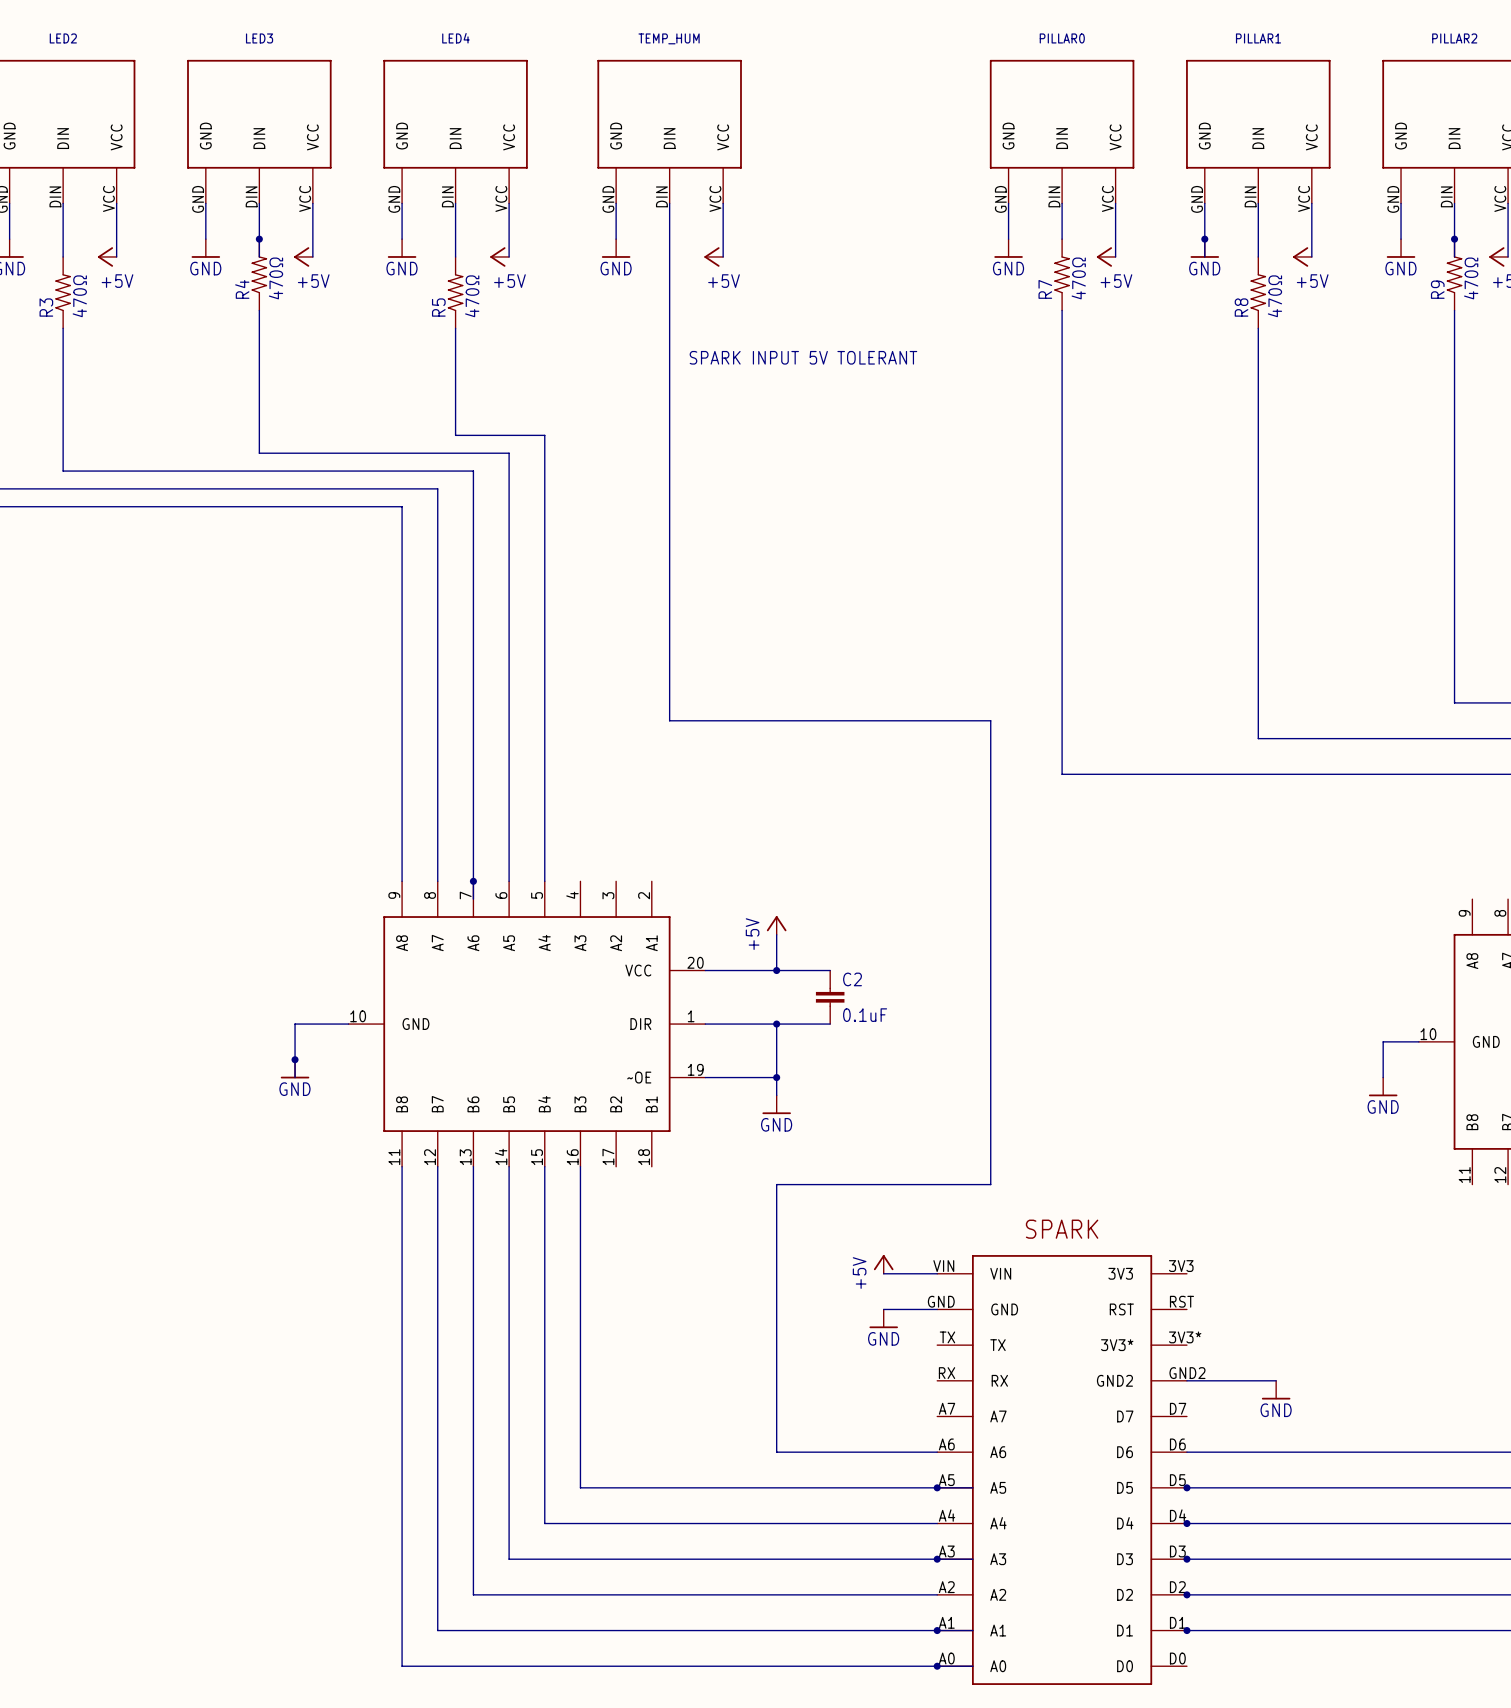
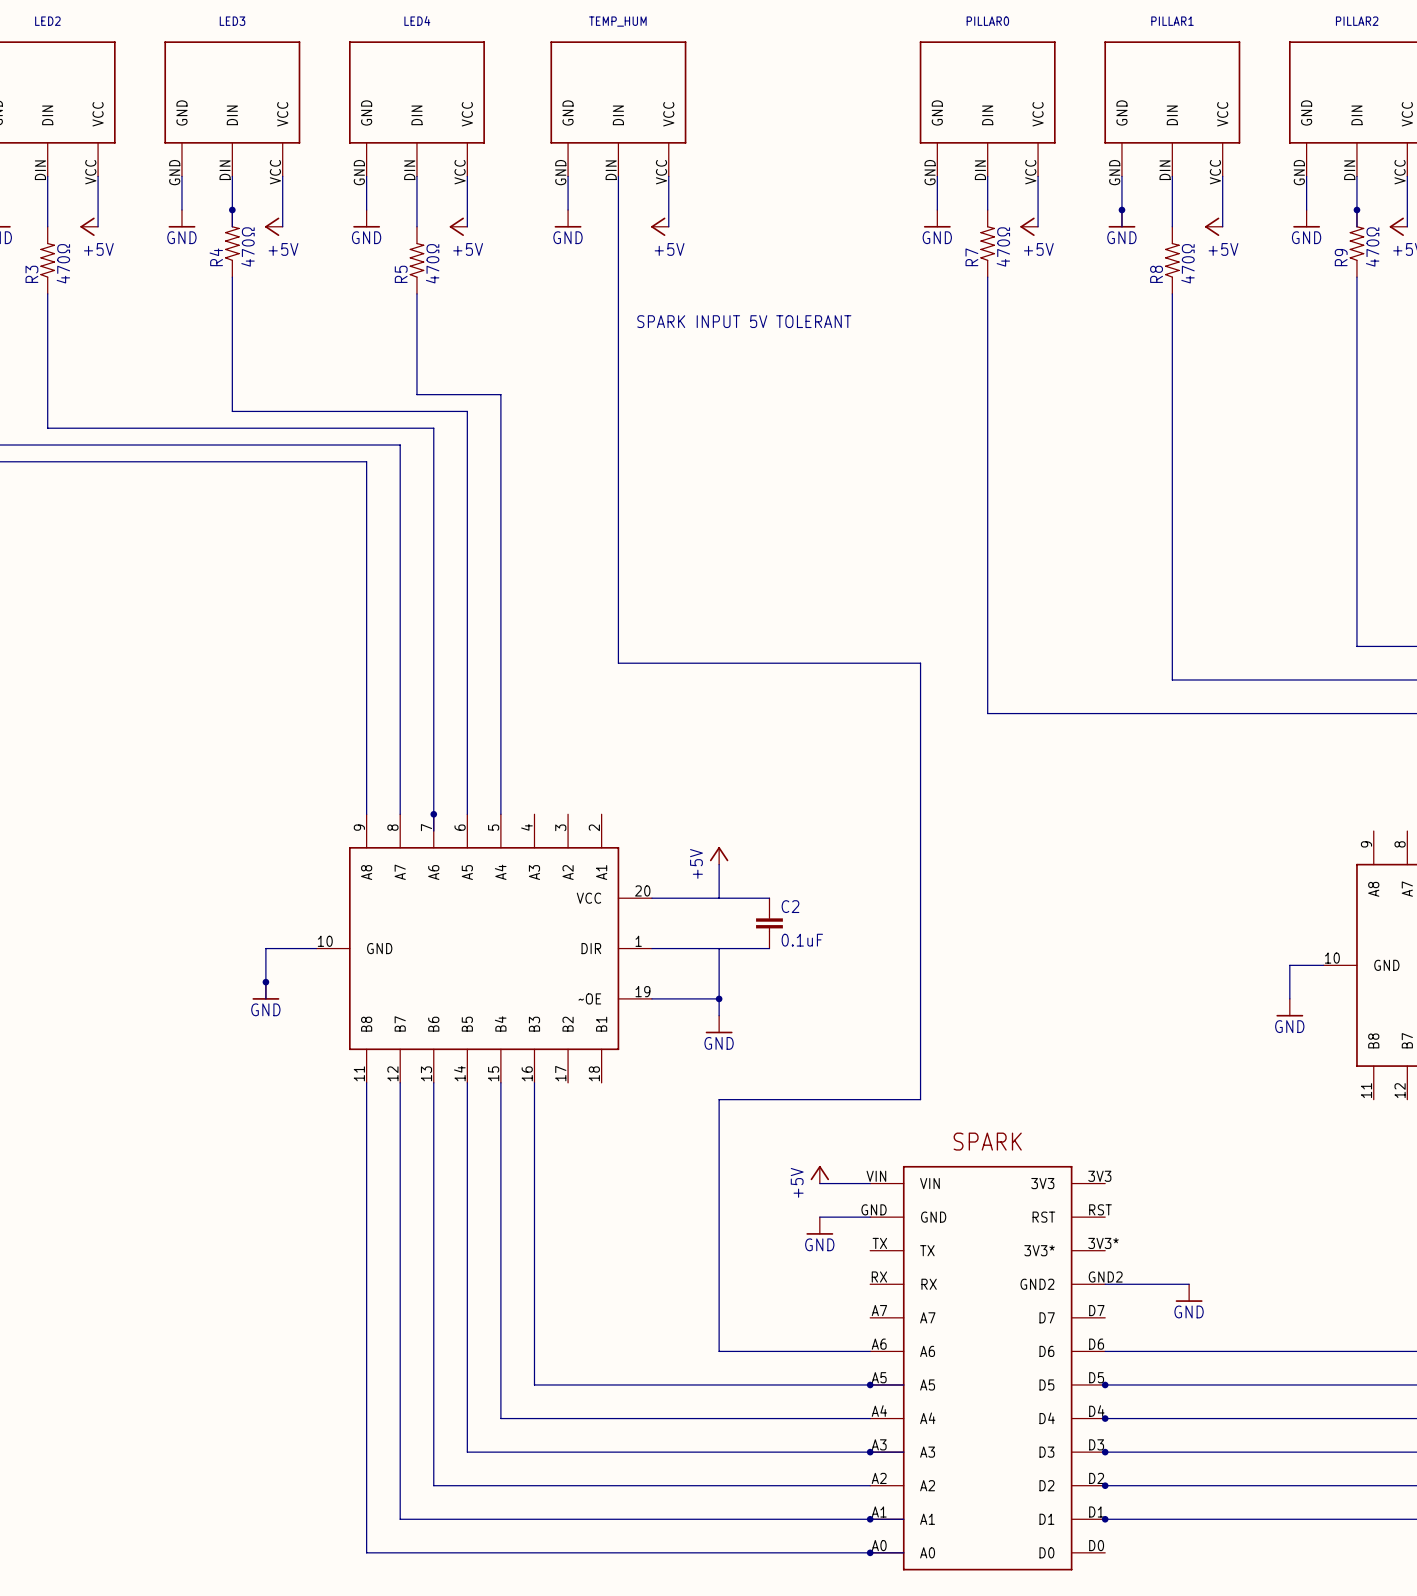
junction: (776, 970) -> none
junction: (776, 1024) -> none

